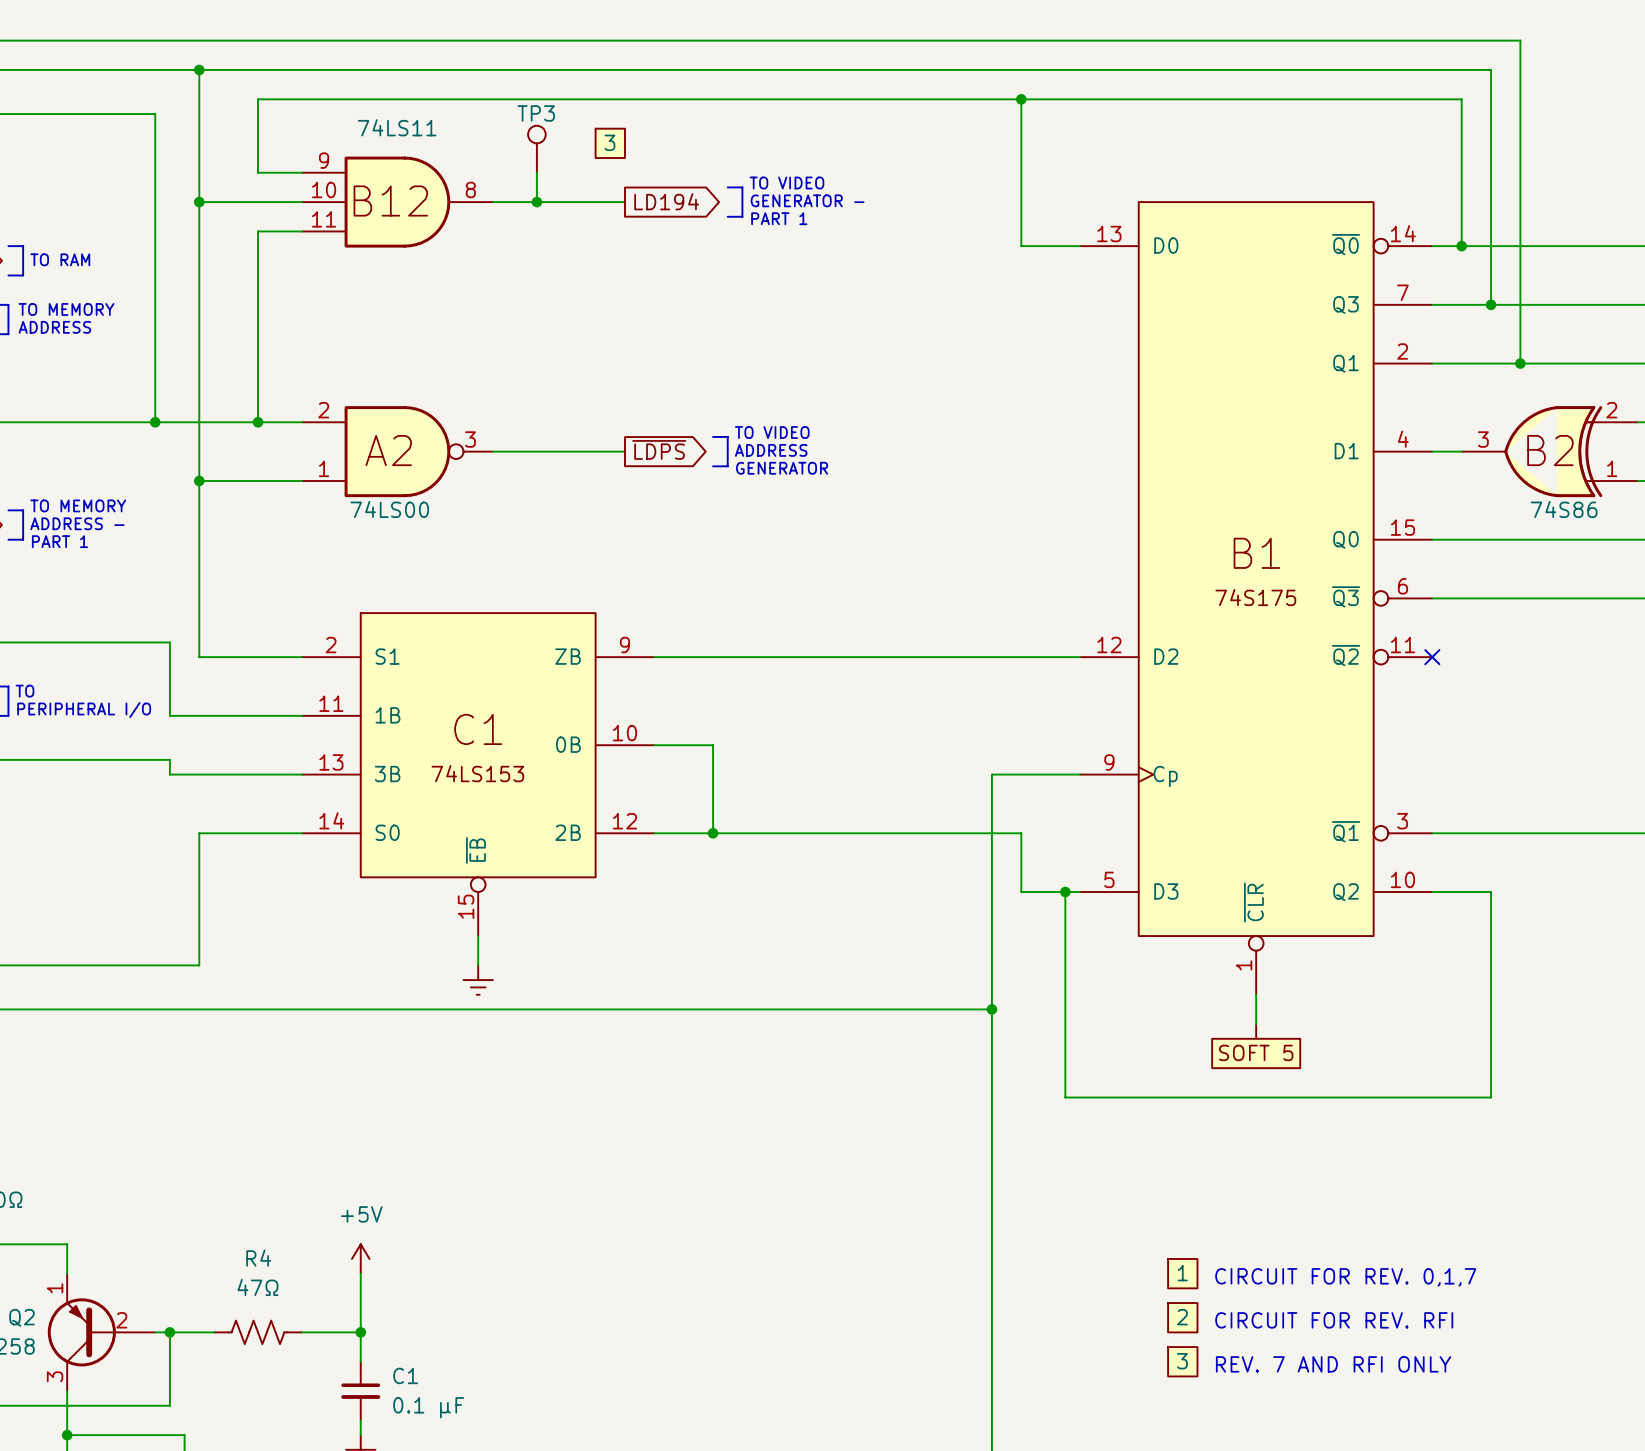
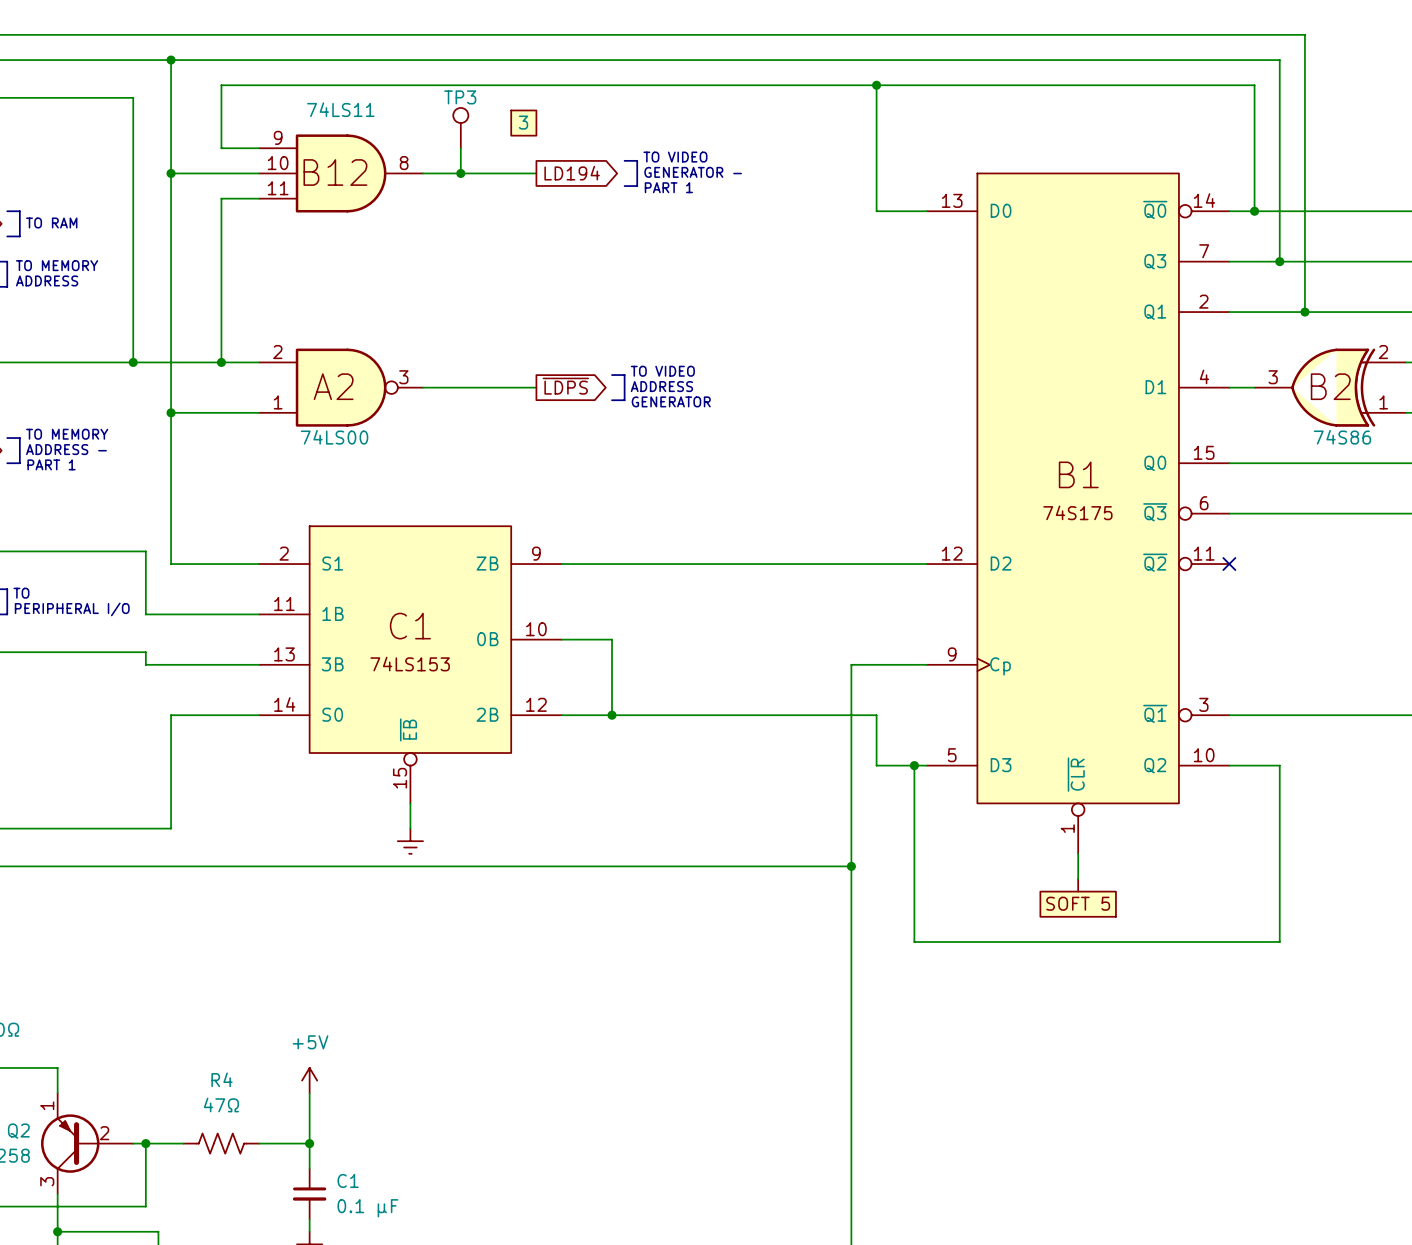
part: 1 (1182, 1273) -> none
text: CIRCUIT FOR REV. 0,1,7 (1345, 1277) -> none
part: 2 (1182, 1317) -> none
text: CIRCUIT FOR REV. RFI (1334, 1320) -> none
part: 3 (1182, 1361) -> none
text: REV. 7 AND RFI ONLY (1333, 1364) -> none

